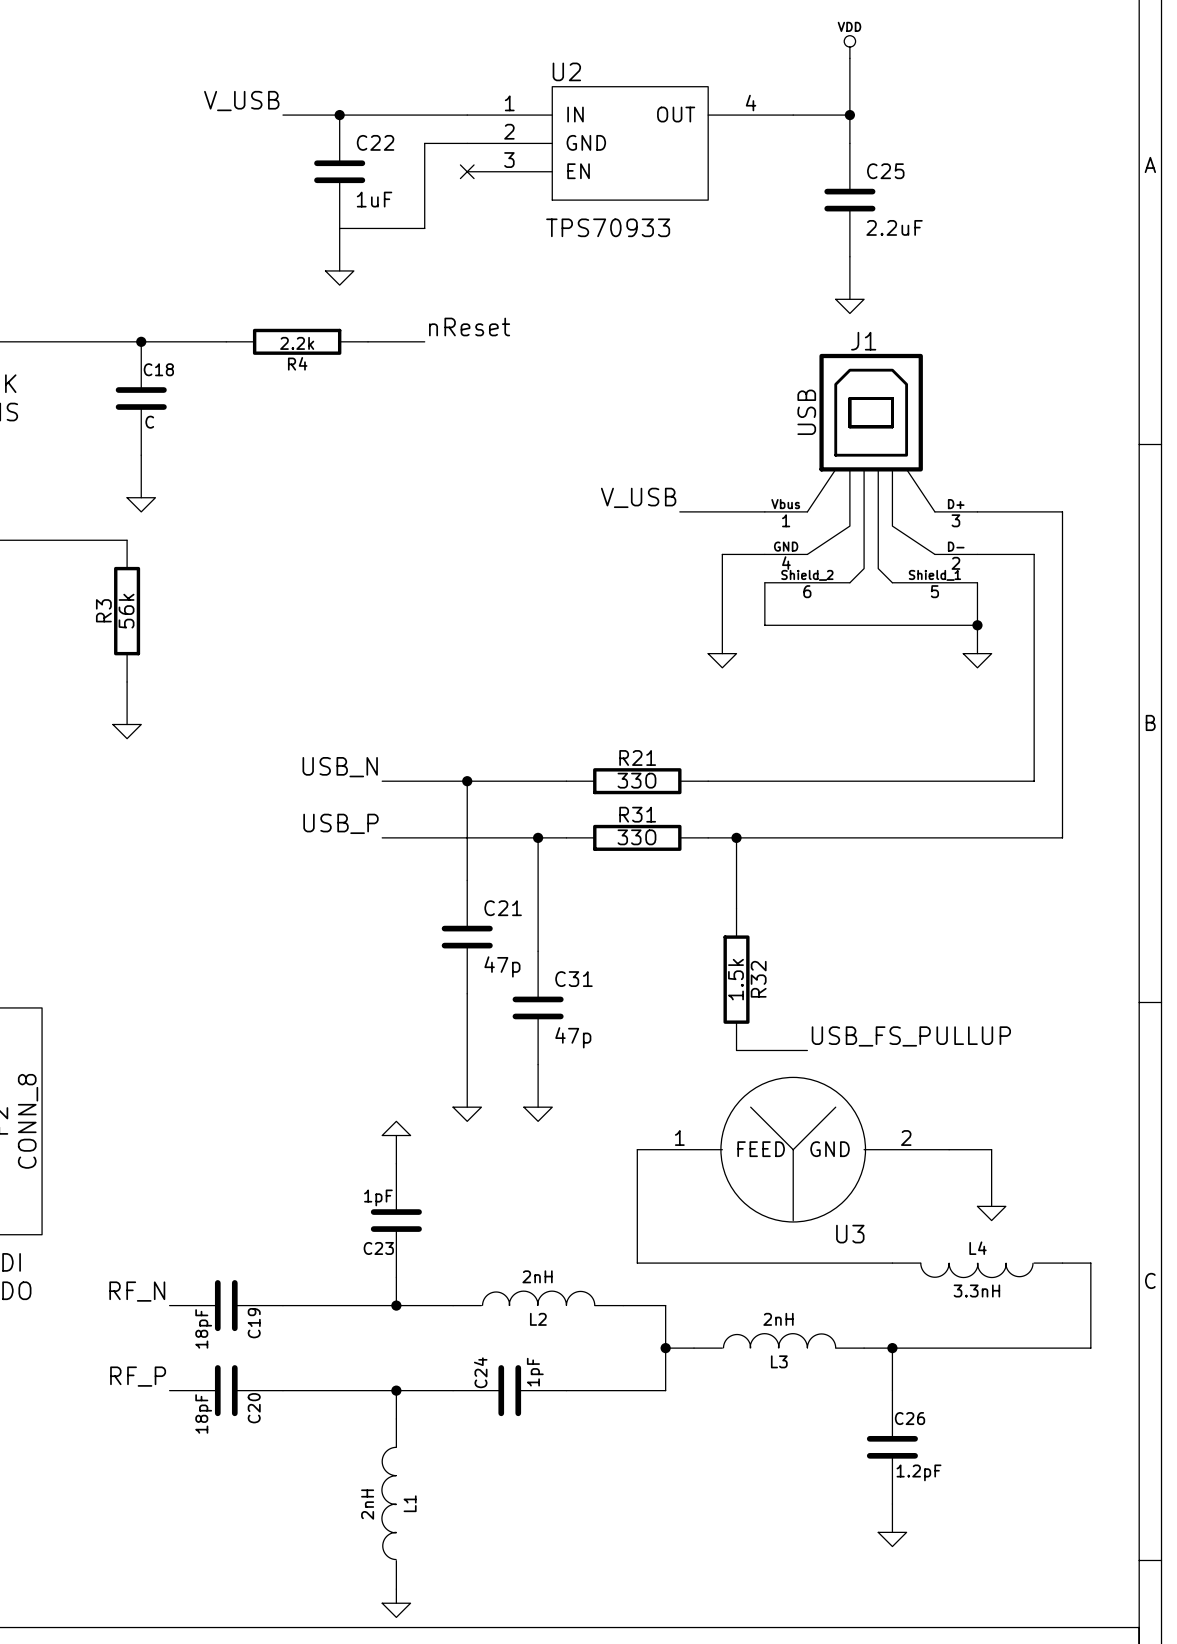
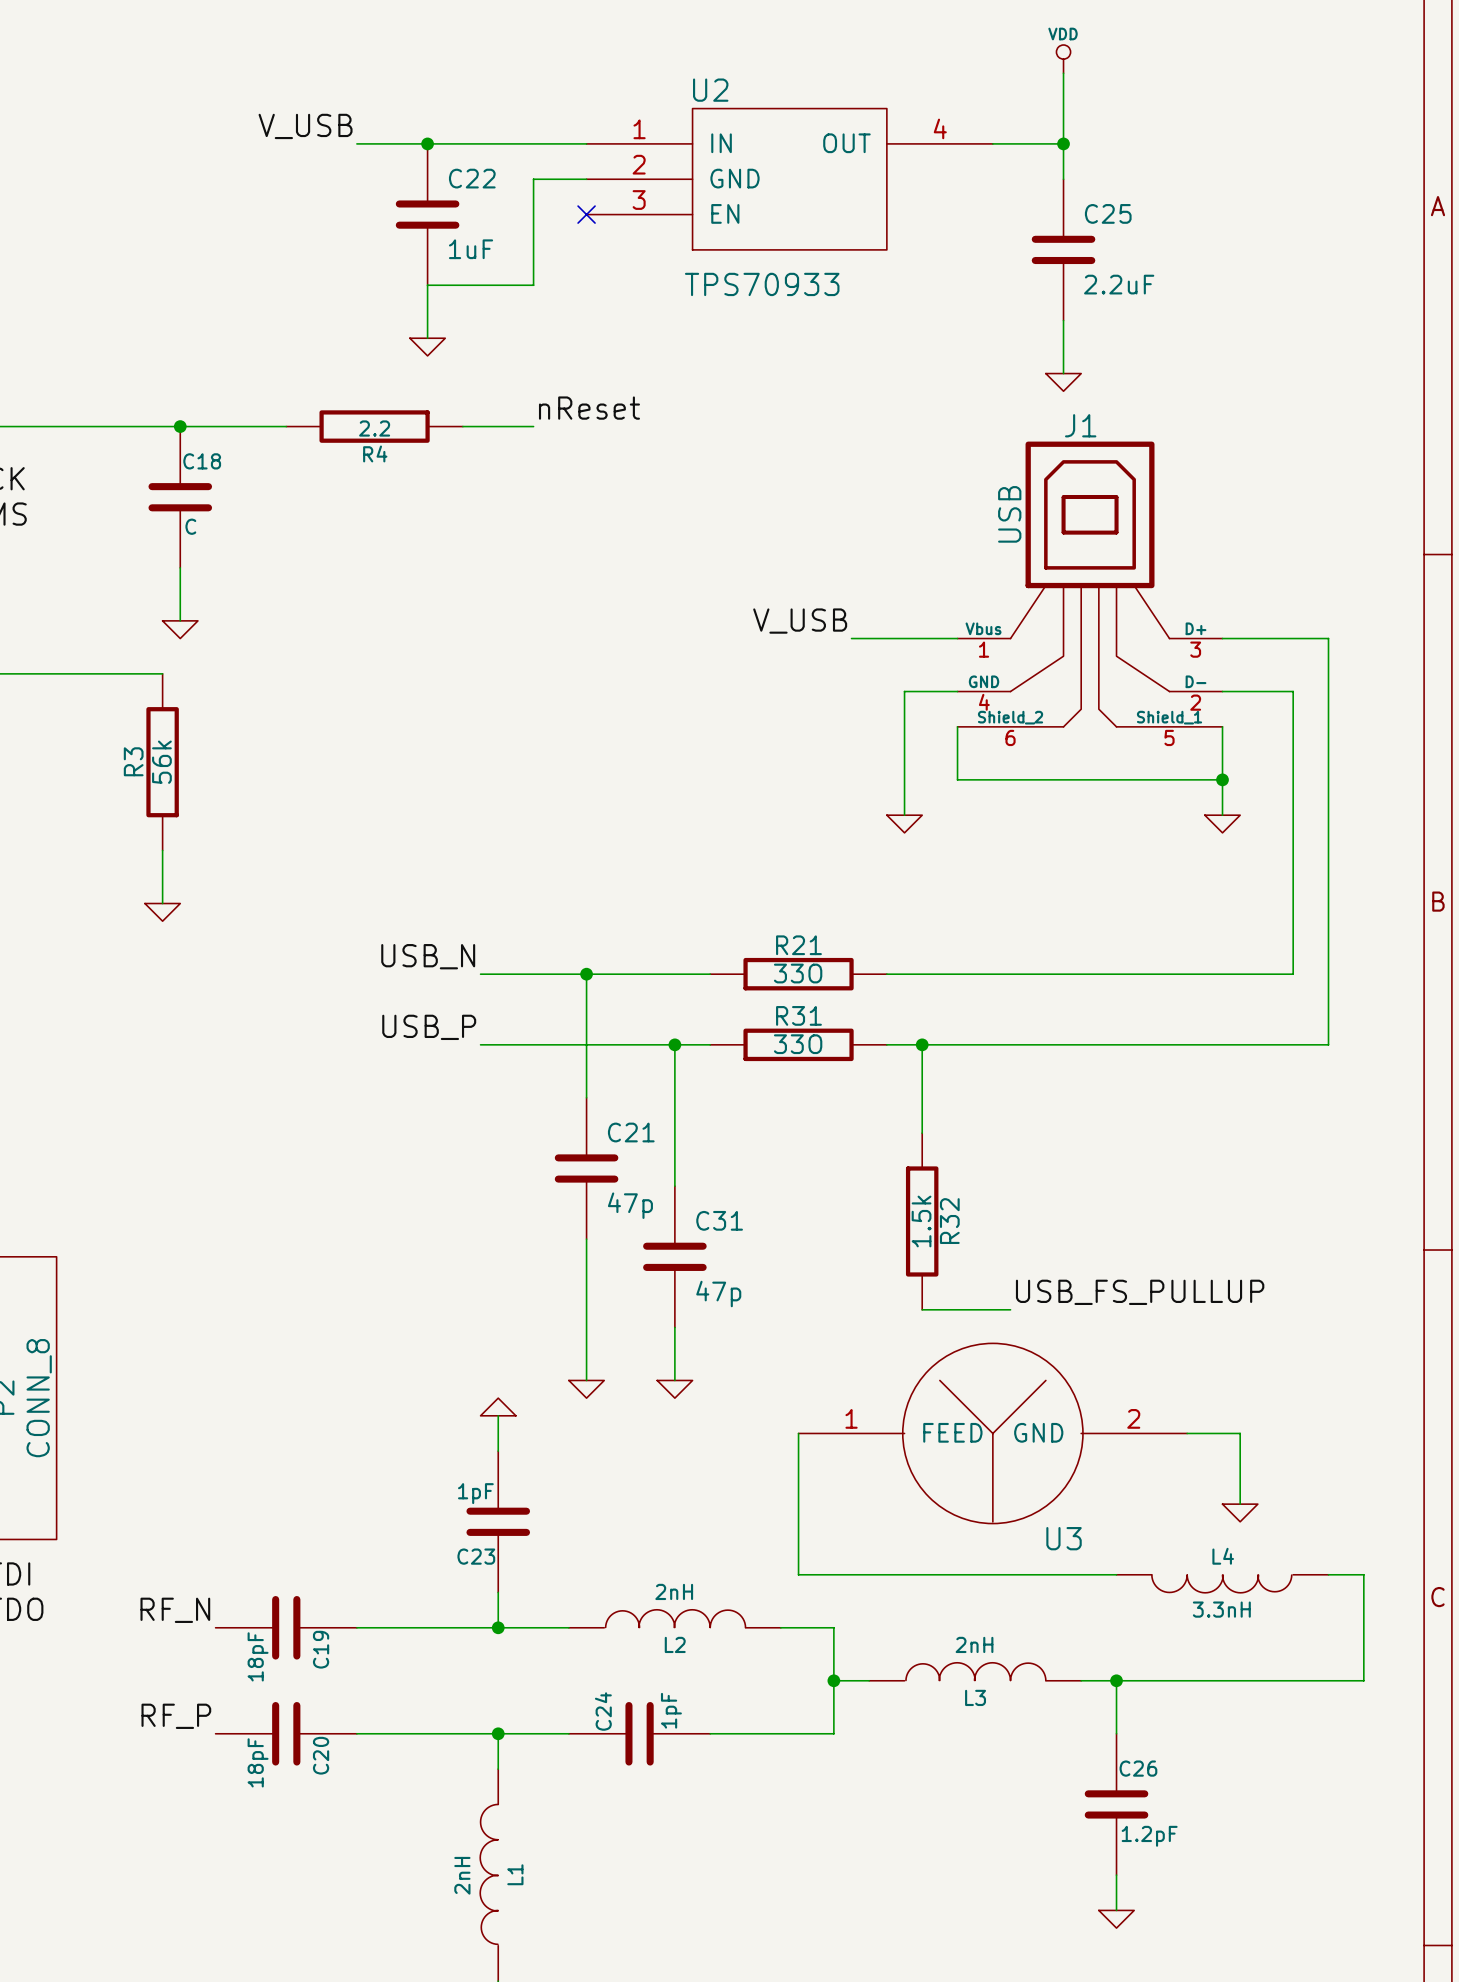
R4 value: 2.2k (297, 343) -> 2.2 (374, 428)

